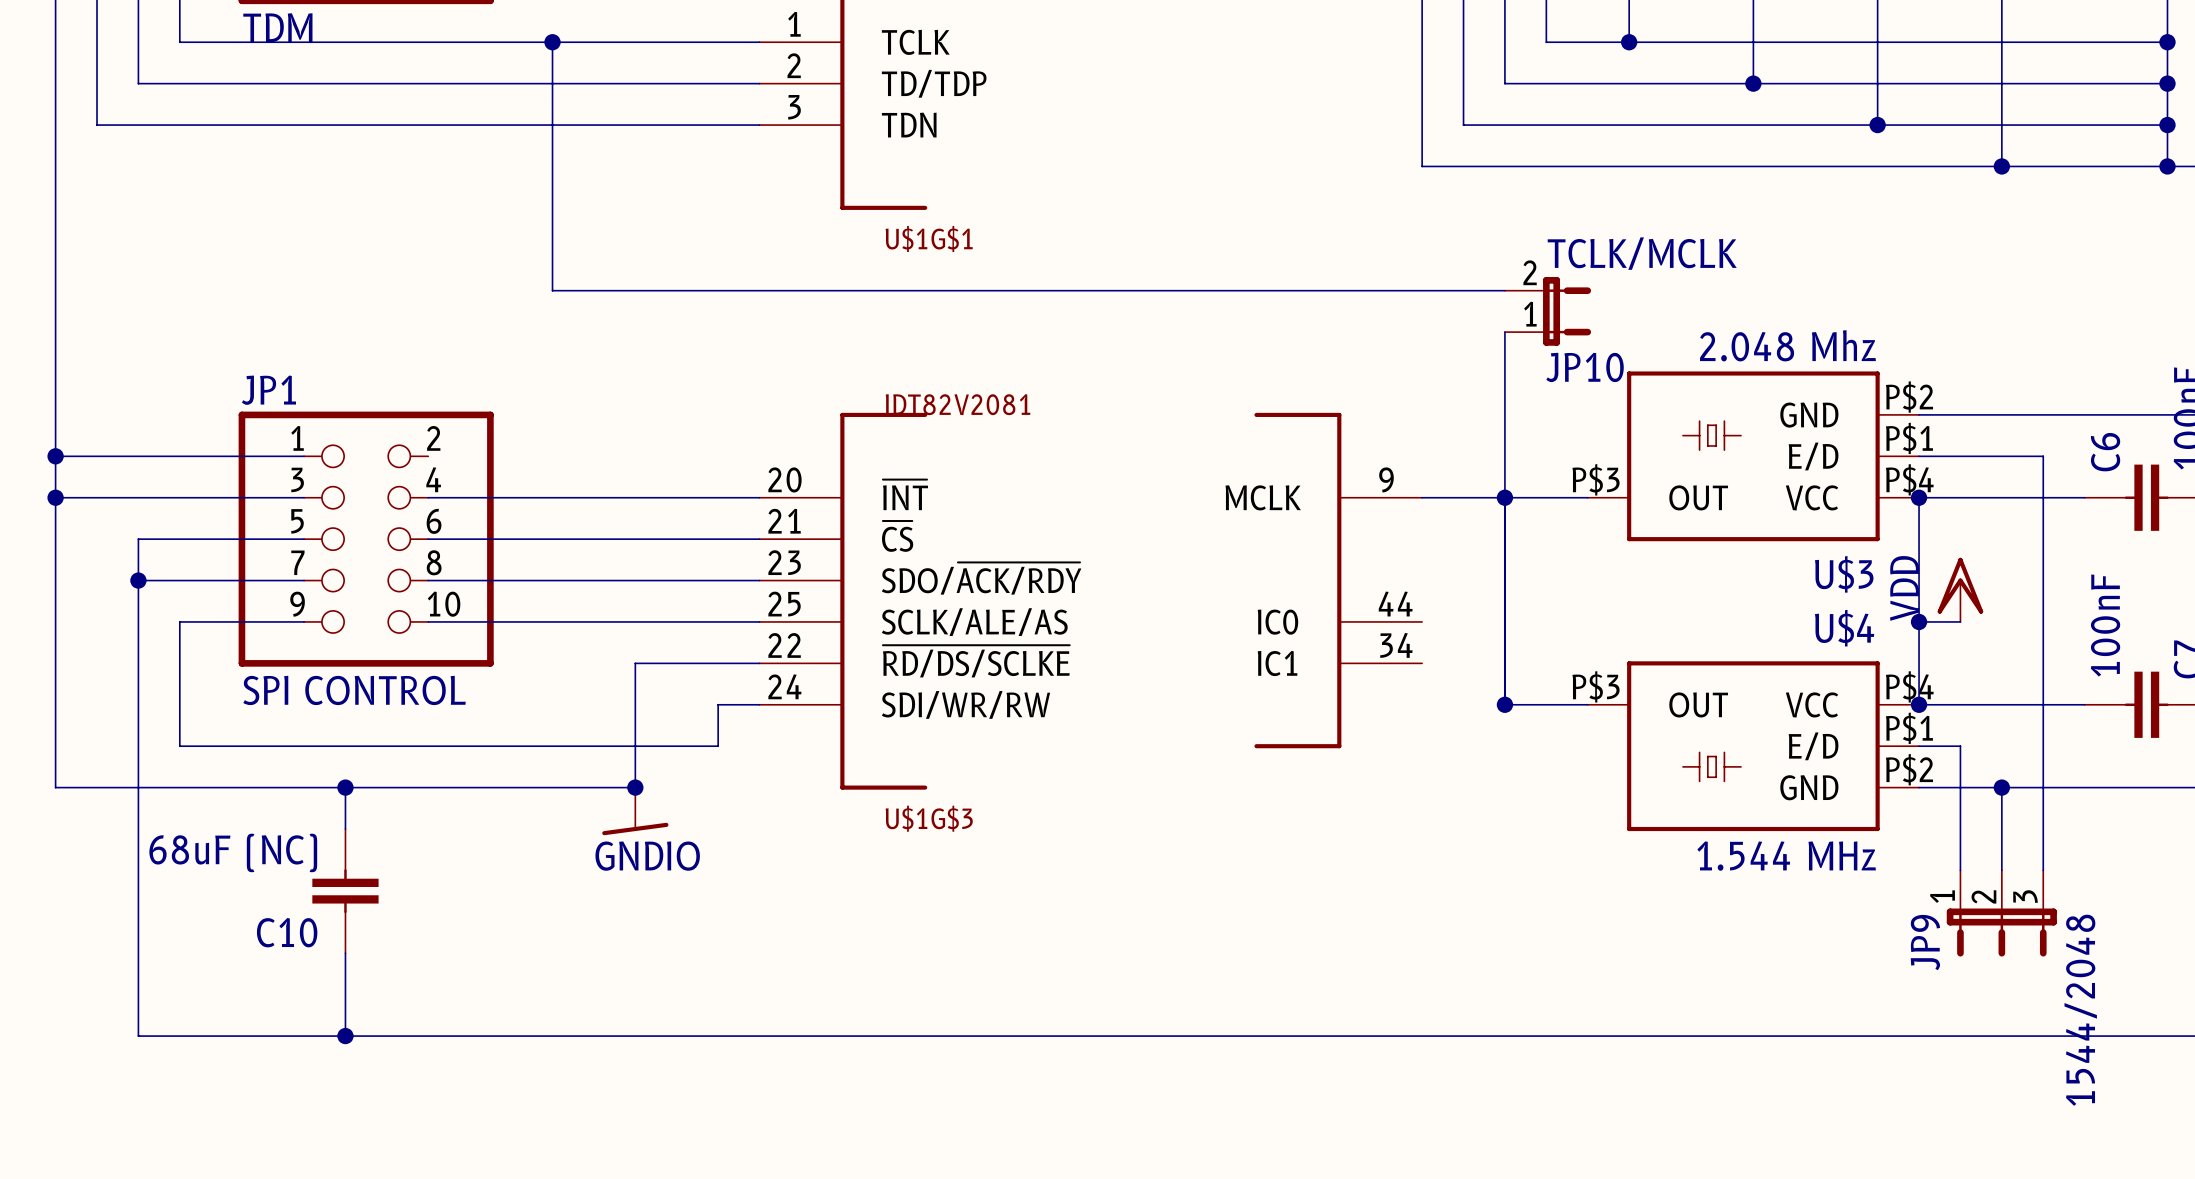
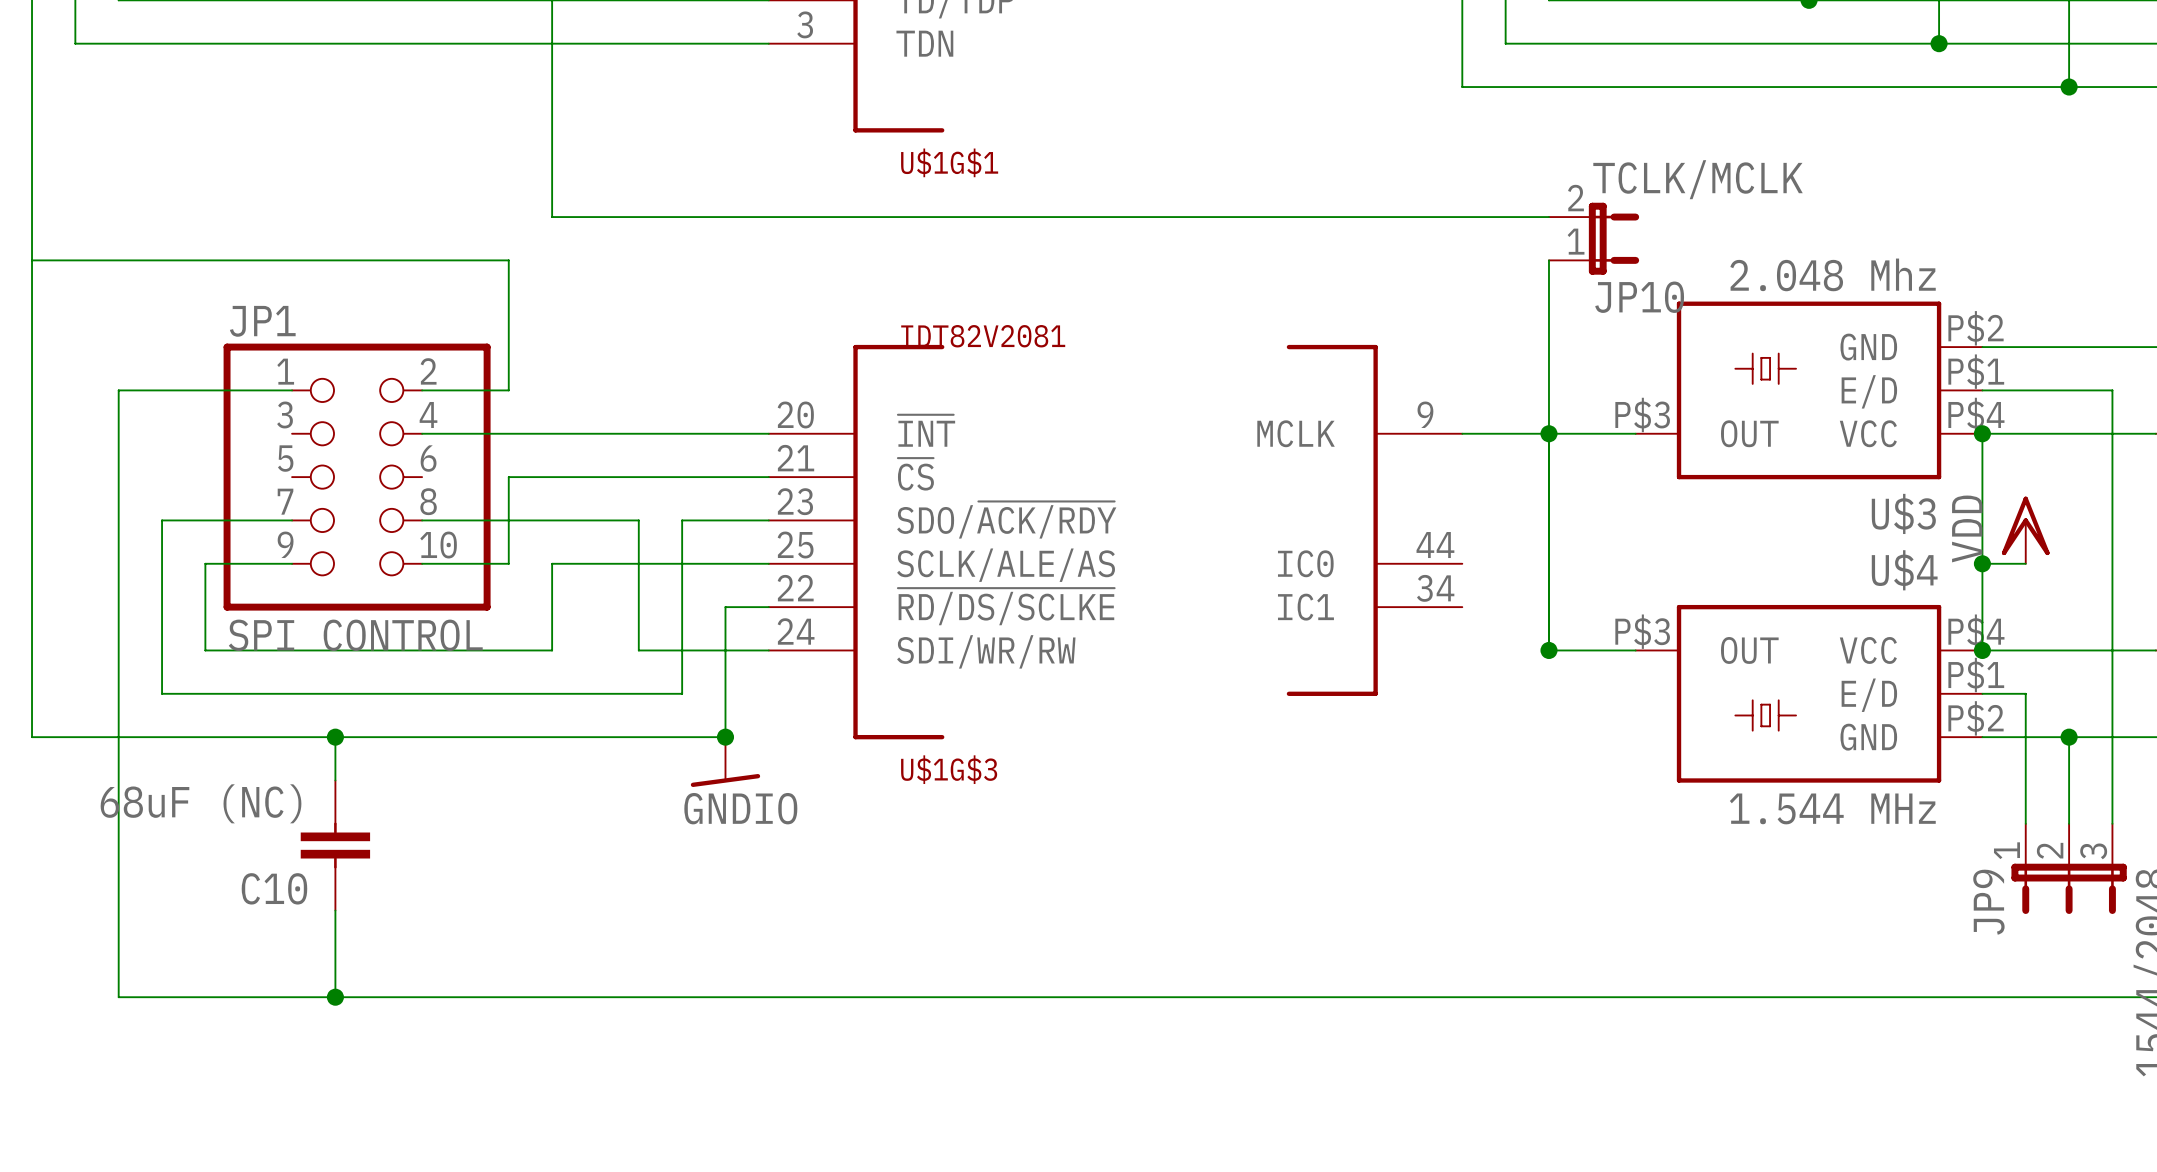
wire: none -> (32, 260) (508, 260) (508, 390) (422, 390)
wire: (55, 456) (138, 456) -> (118, 477) (118, 390)
junction: (55, 456) -> none
wire: (55, 497) (304, 497) -> none
junction: (55, 497) -> none
wire: (138, 539) (304, 539) -> none
wire: (428, 539) (511, 539) -> none
wire: (138, 580) (179, 580) -> (162, 563) (162, 520)
junction: (138, 580) -> none
wire: (635, 580) (676, 580) -> (638, 520) (638, 607)
wire: none -> (682, 520) (682, 693)
wire: (179, 621) (221, 621) -> (552, 563) (552, 650) (205, 650) (205, 563)
wire: (511, 621) (552, 621) -> (508, 563) (508, 477)
wire: (635, 663) (718, 663) -> (638, 650) (725, 650) (725, 607)
wire: (635, 704) (635, 787) -> none
wire: (676, 746) (718, 746) -> (638, 737) (725, 737) (725, 693)
junction position: (635, 787) -> (725, 737)
power symbol position: GNDIO (635, 811) -> GNDIO (725, 762)

